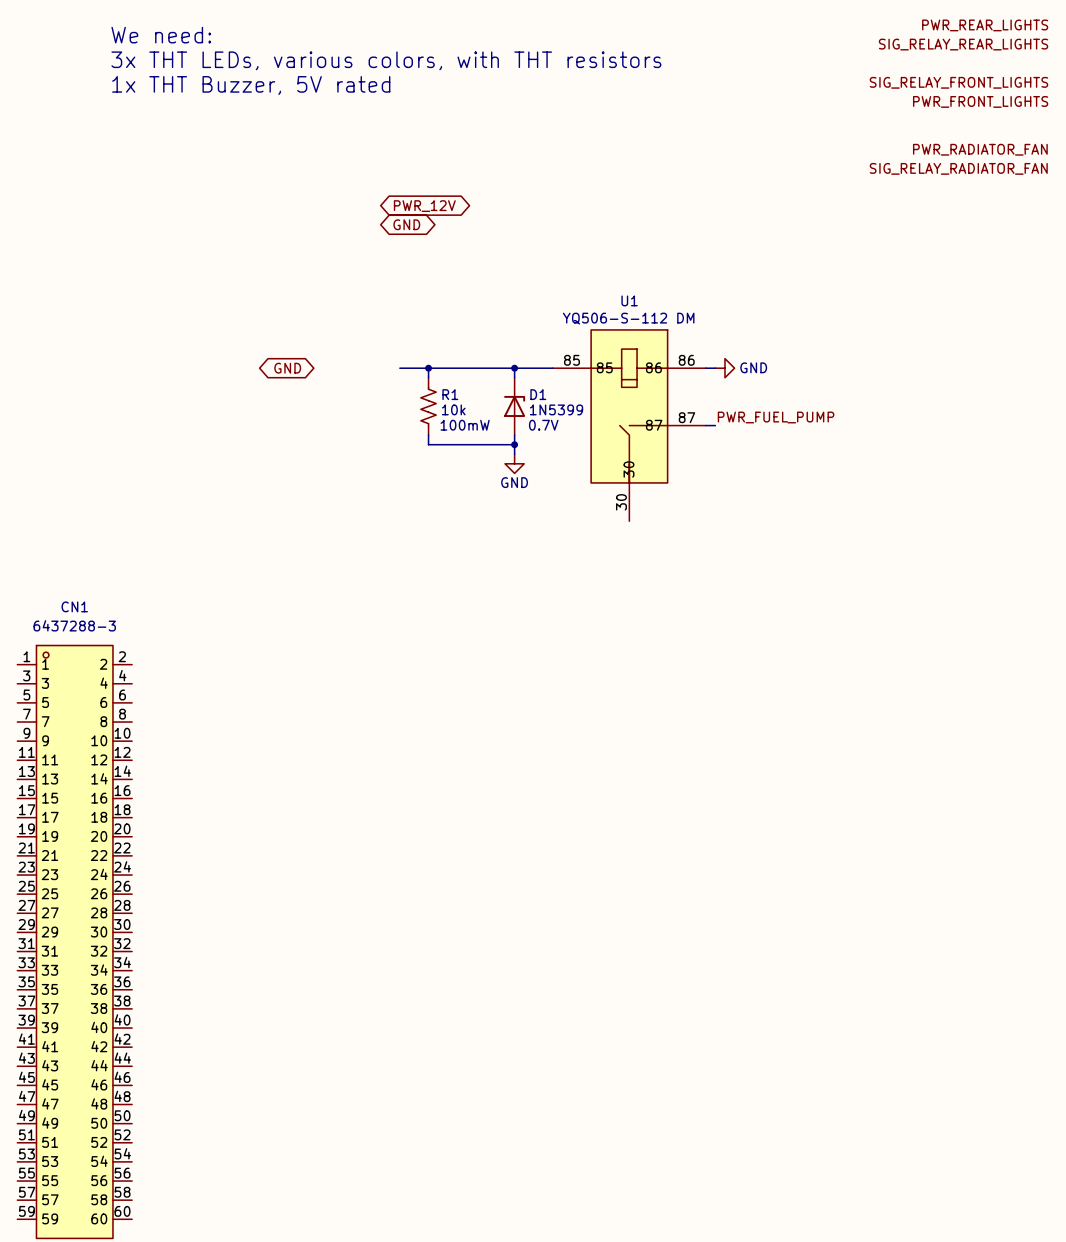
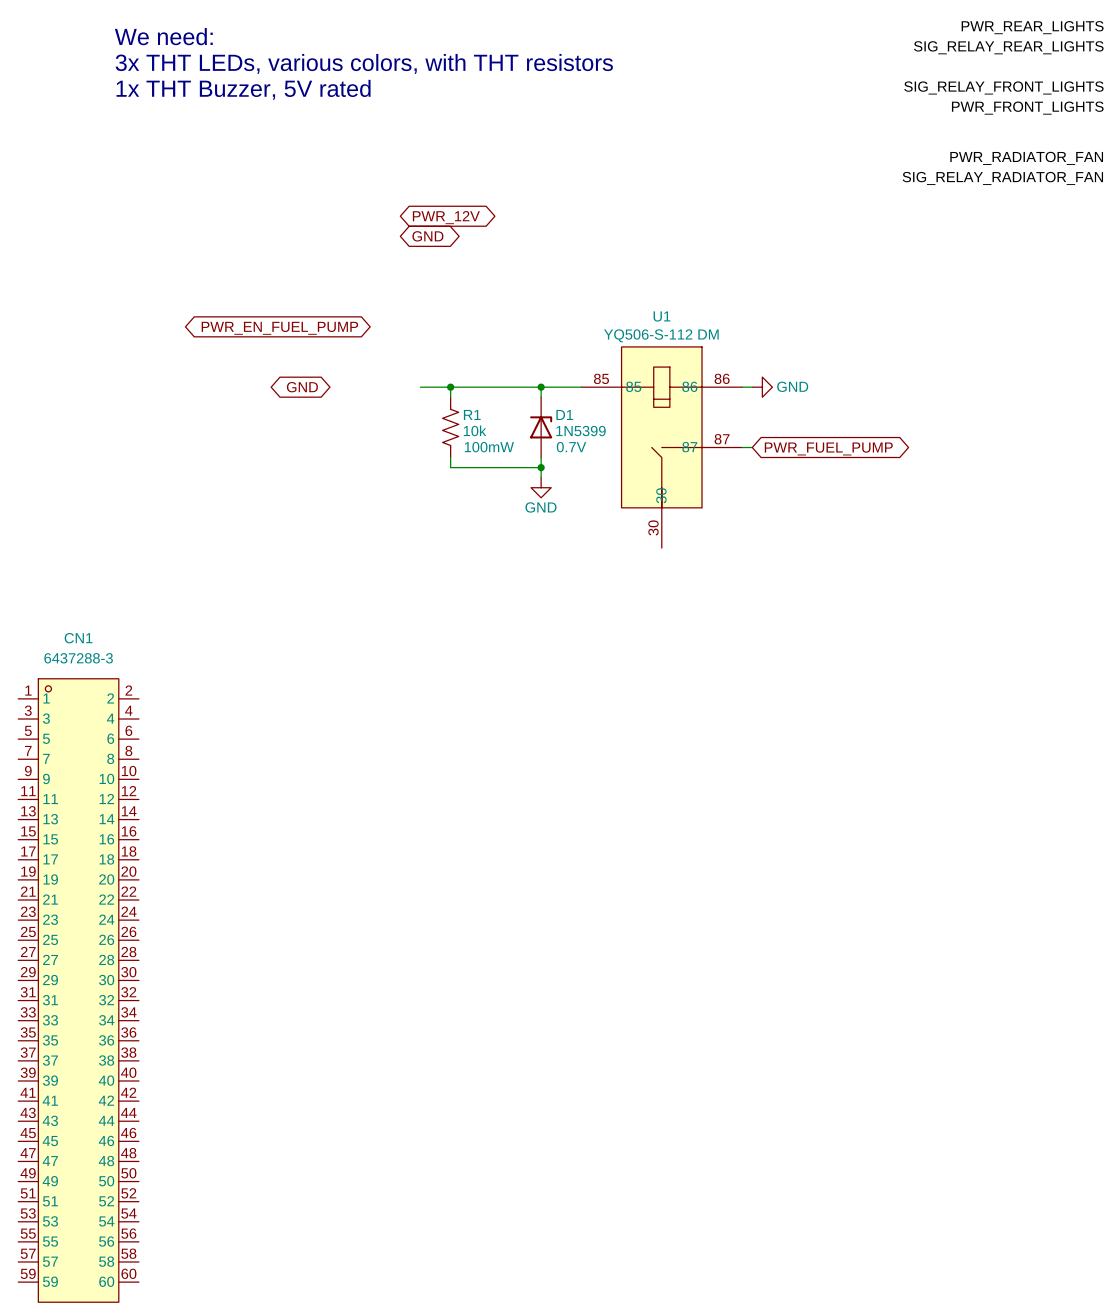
global label: none -> PWR_EN_FUEL_PUMP (279, 328)
label: PWR_FUEL_PUMP (776, 417) -> none
global label: none -> PWR_FUEL_PUMP (828, 448)

